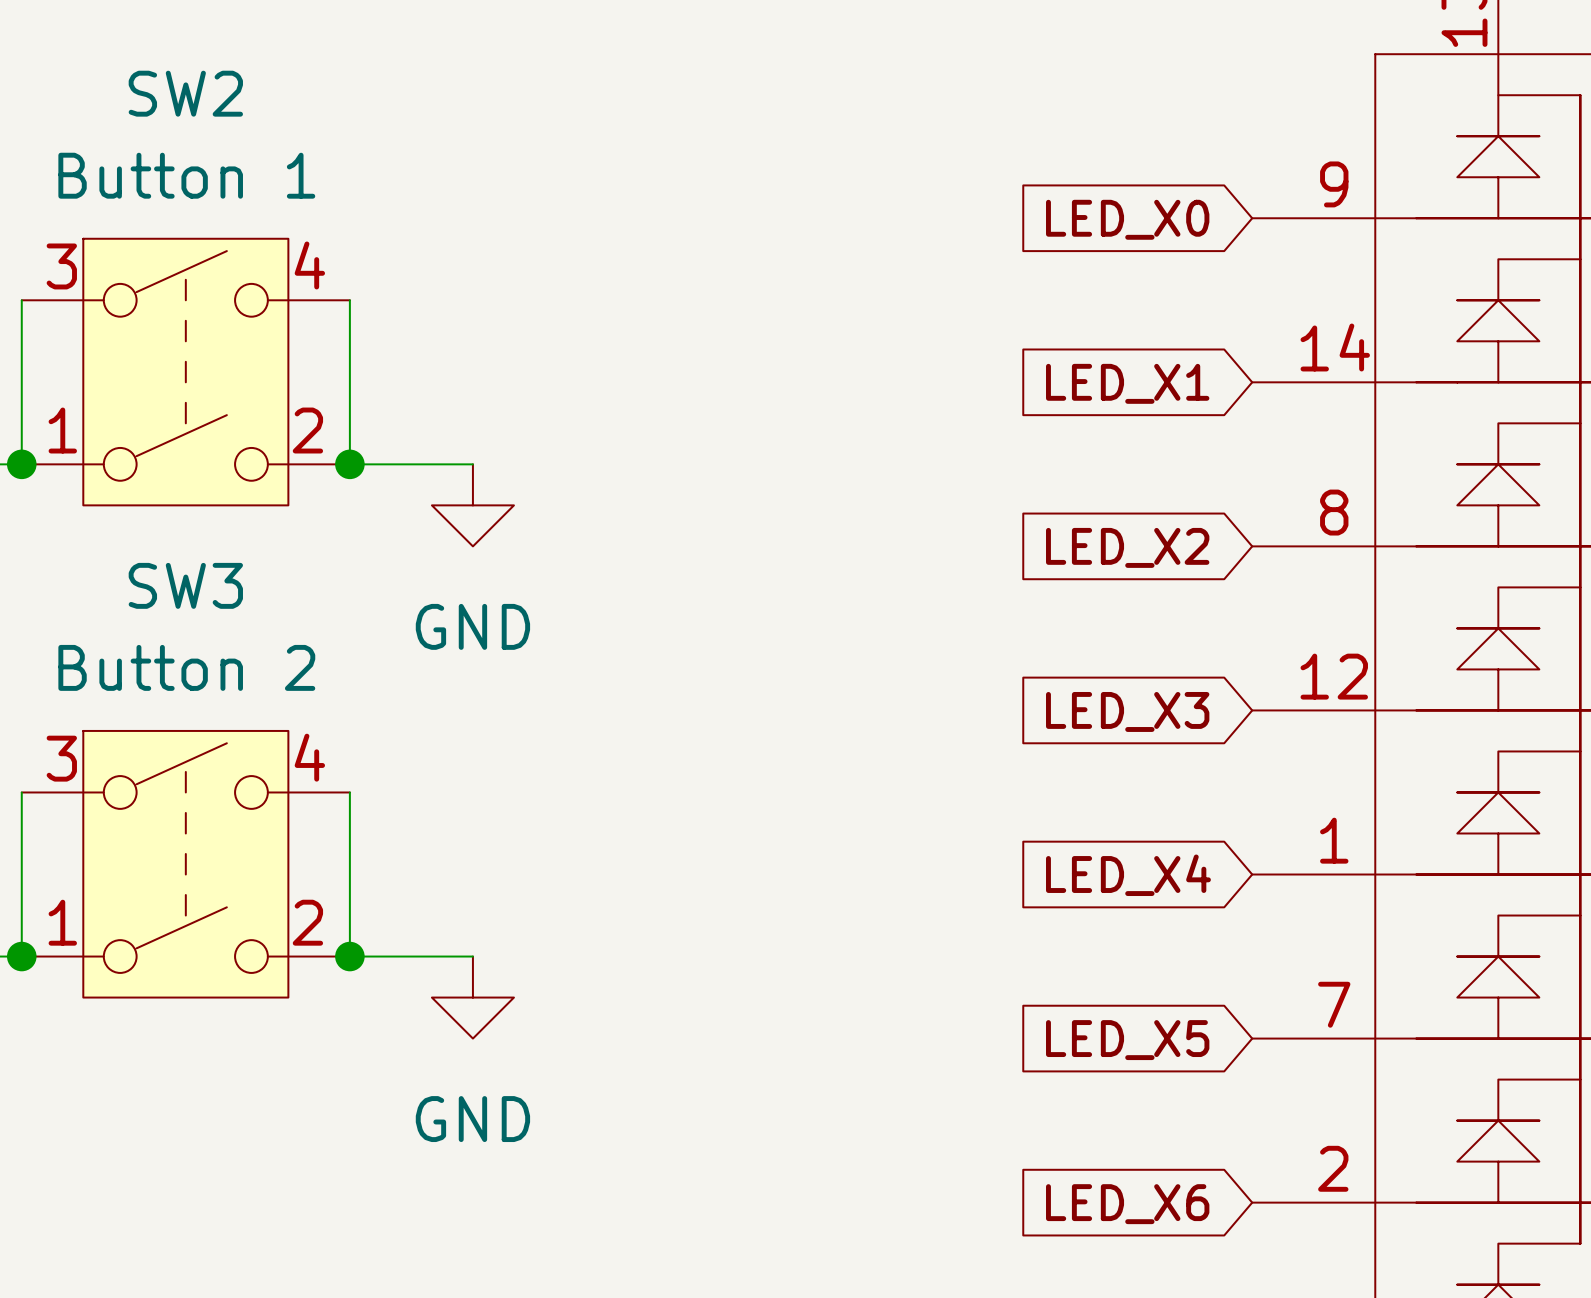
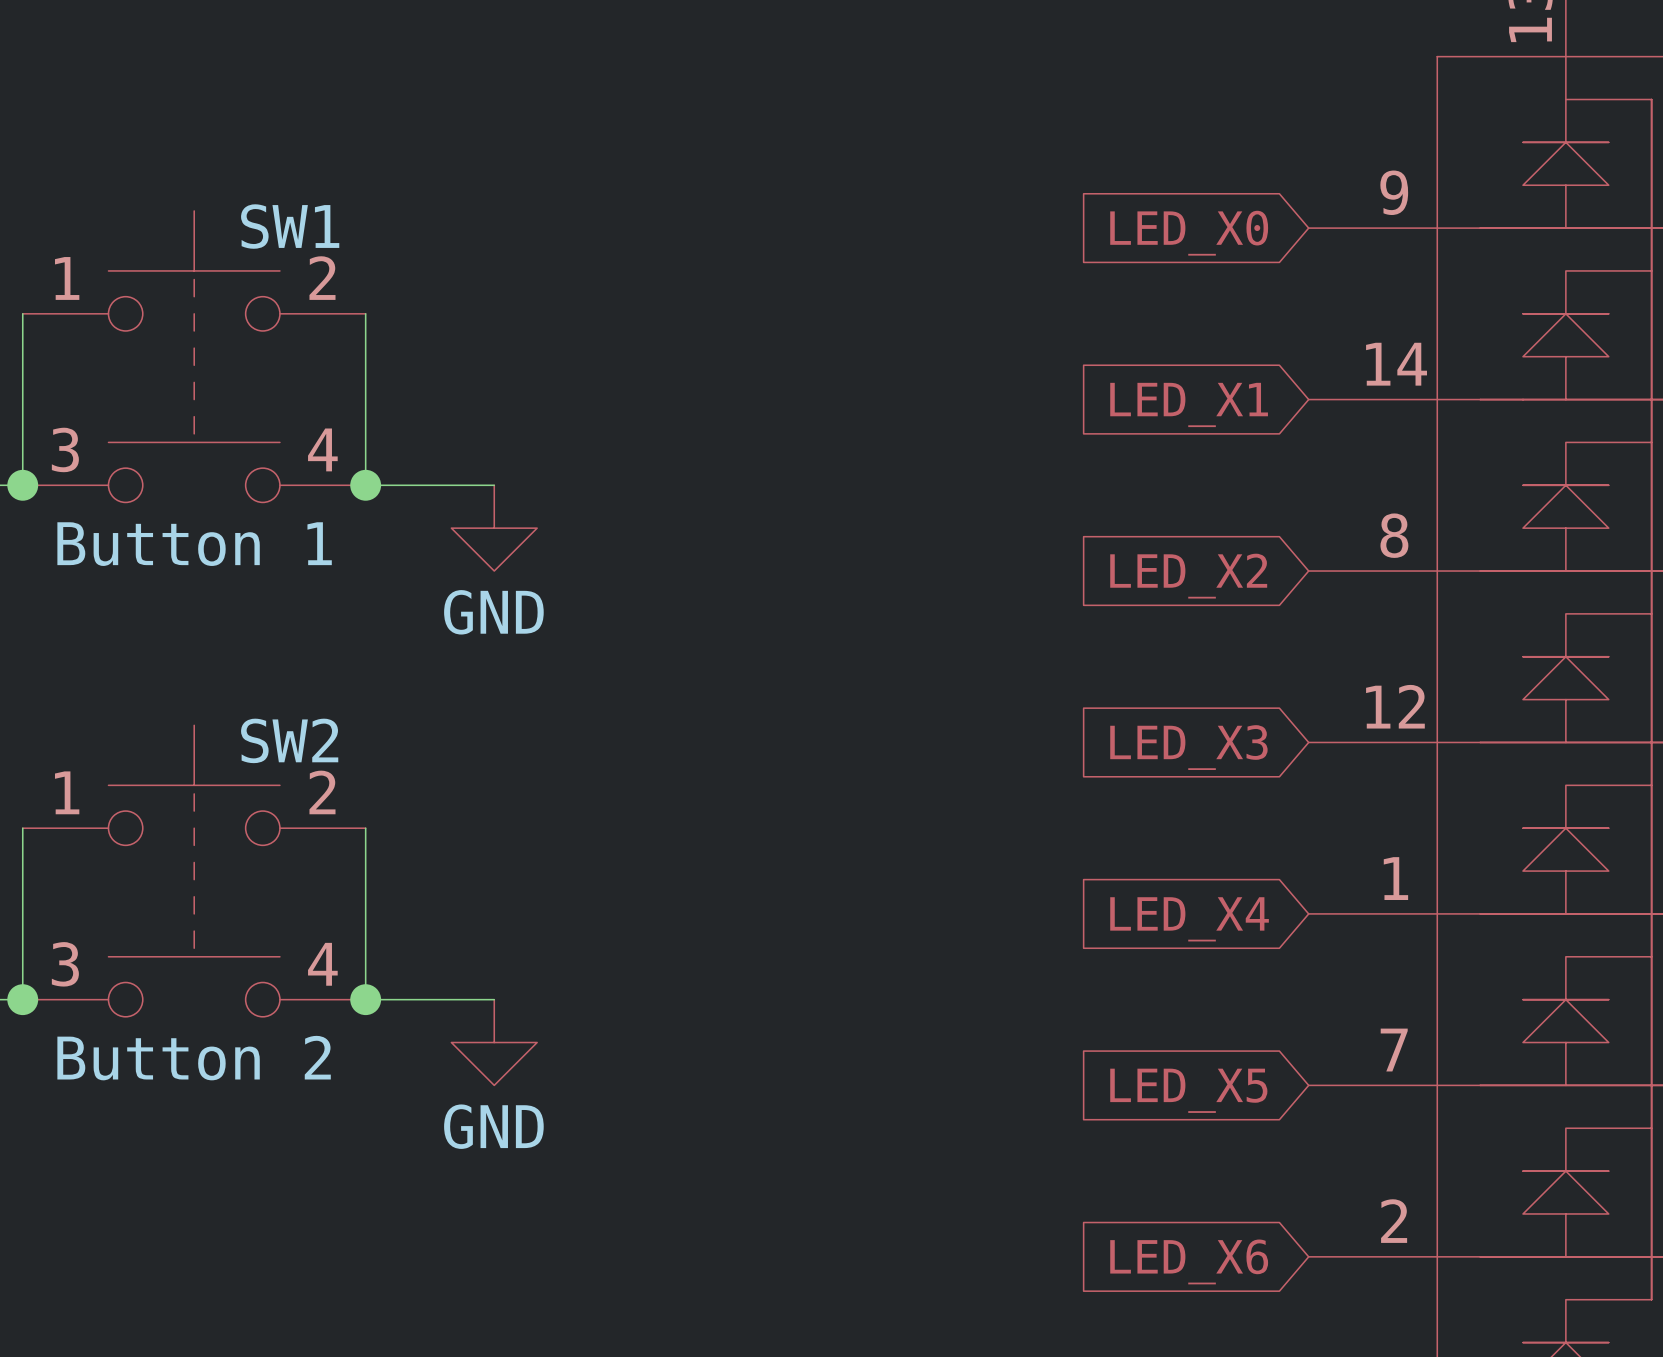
SW2 name position: SW2 (185, 93) -> SW2 (289, 740)
SW2 value: Button 1 (186, 175) -> Button 2 (194, 1058)
SW2 symbol: [21, 238, 350, 506] -> [22, 725, 366, 1017]
SW1: none -> Button 1 (194, 356)
power symbol text position: GND (472, 626) -> GND (493, 612)
SW3: Button 2 (185, 864) -> none
power symbol text position: GND (472, 1119) -> GND (493, 1126)

